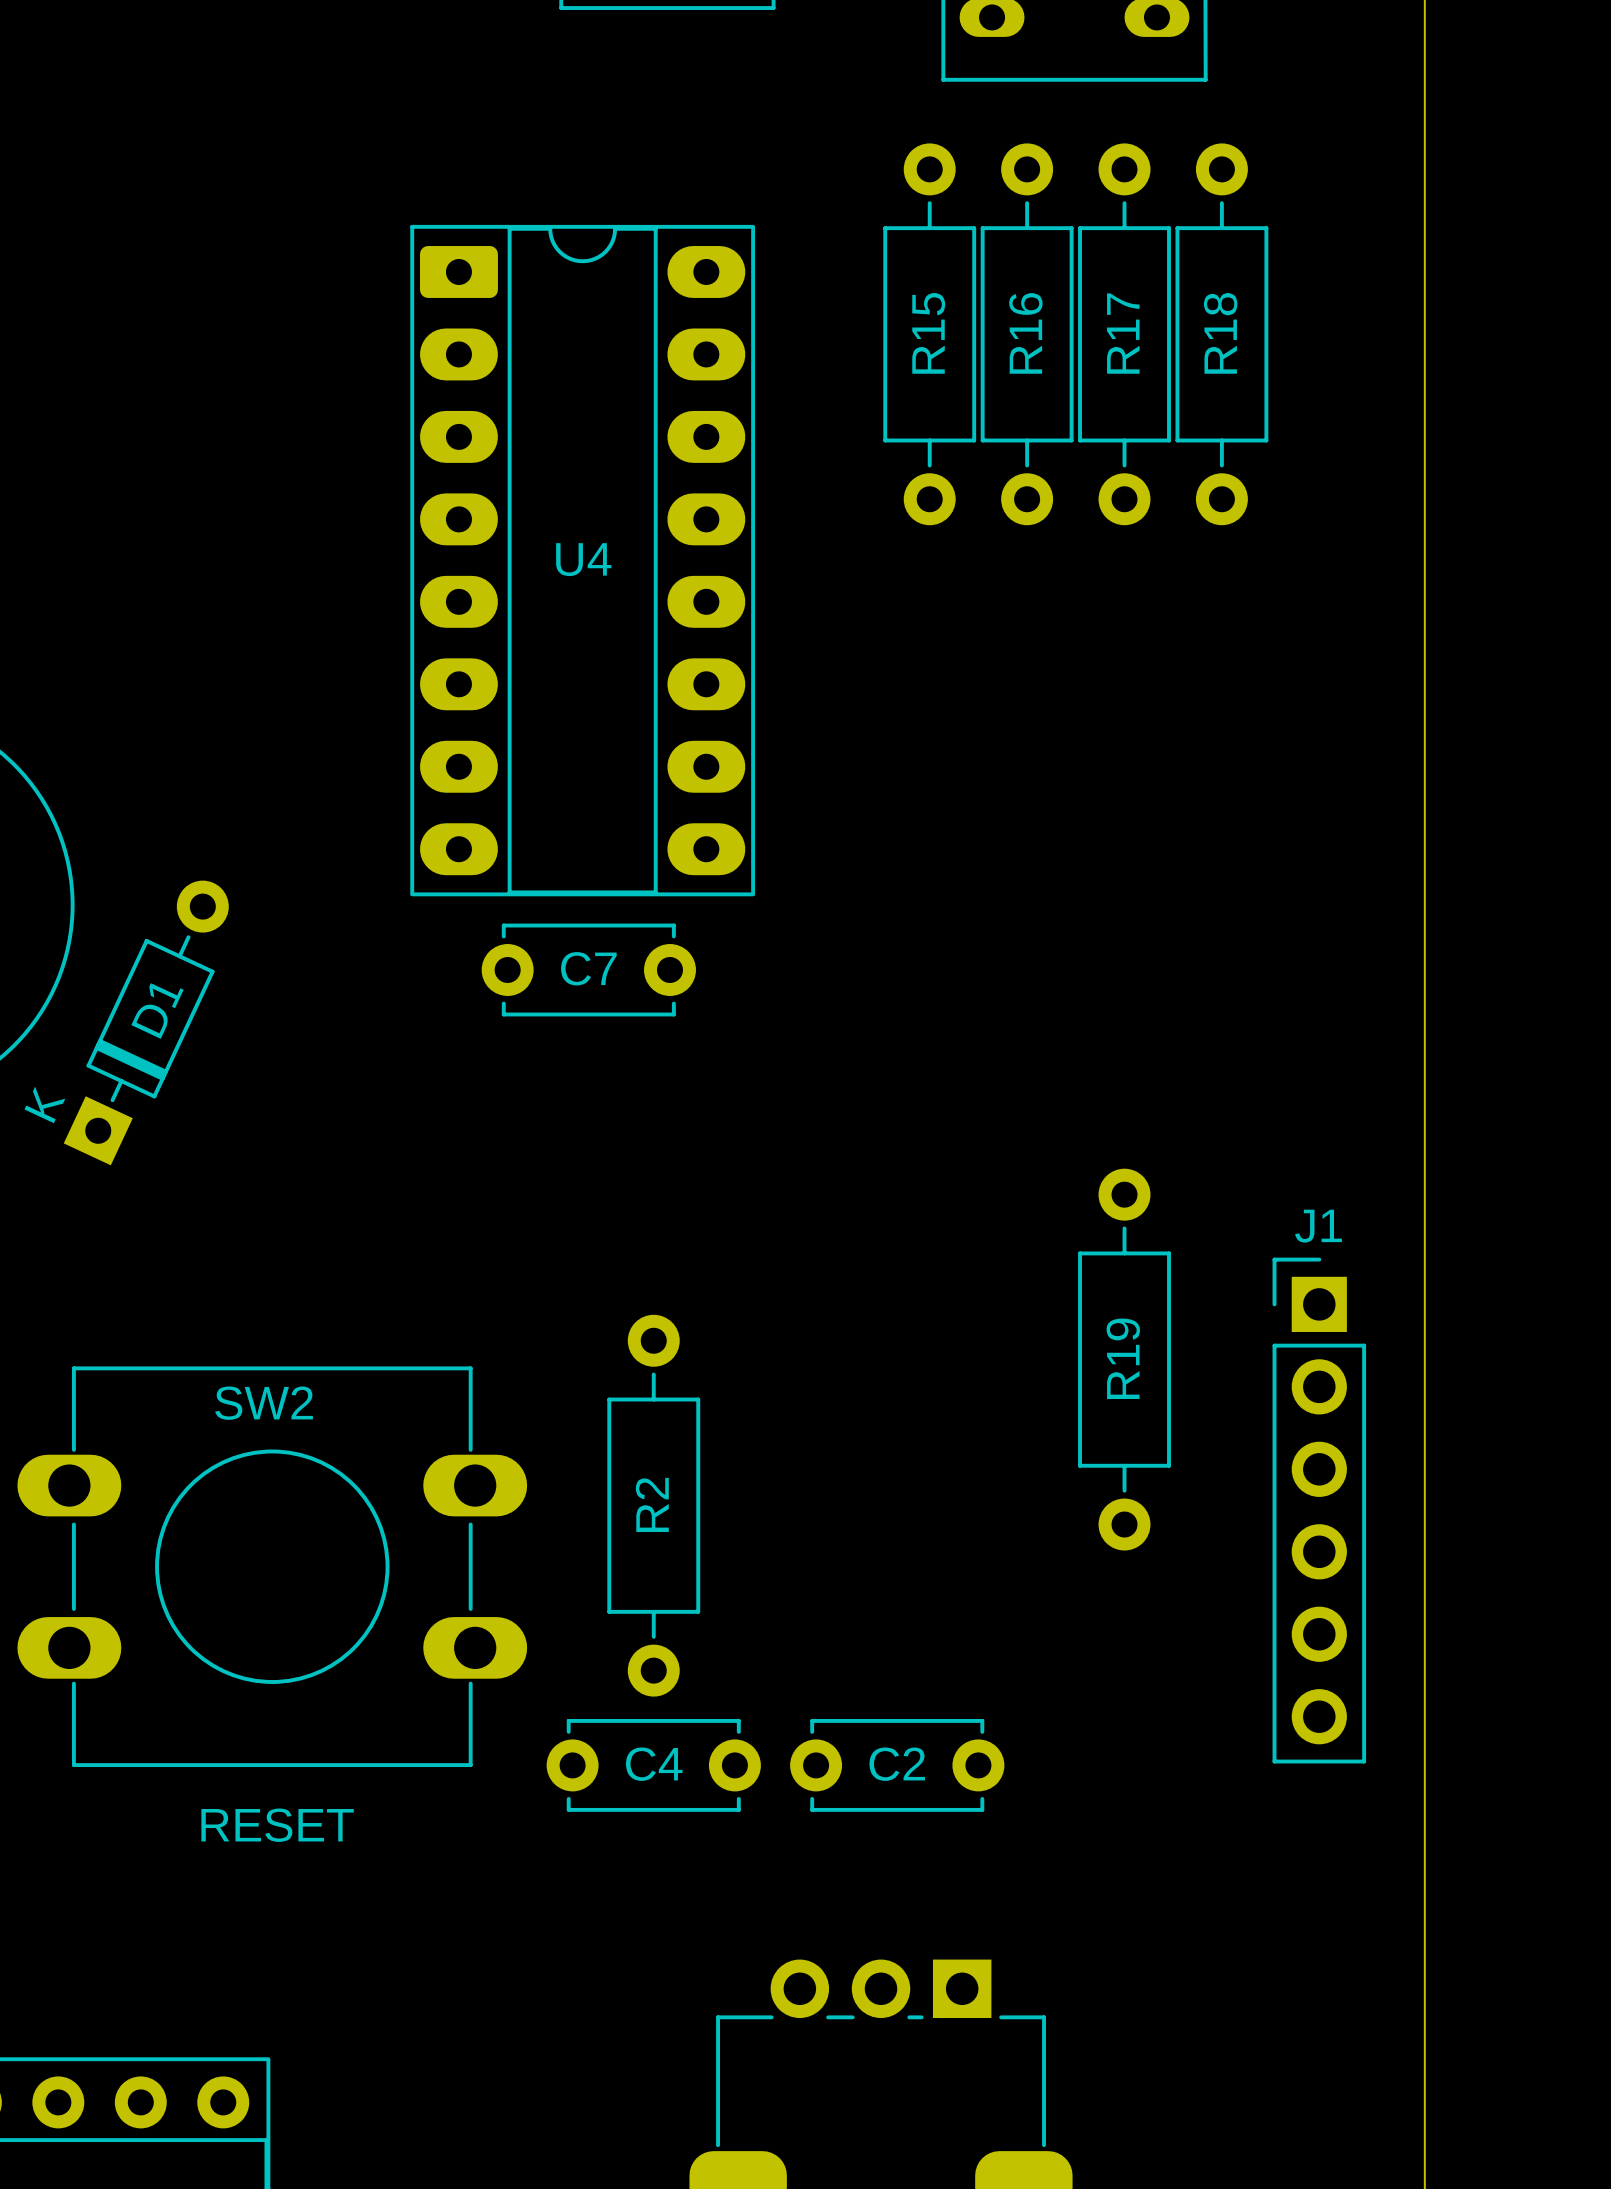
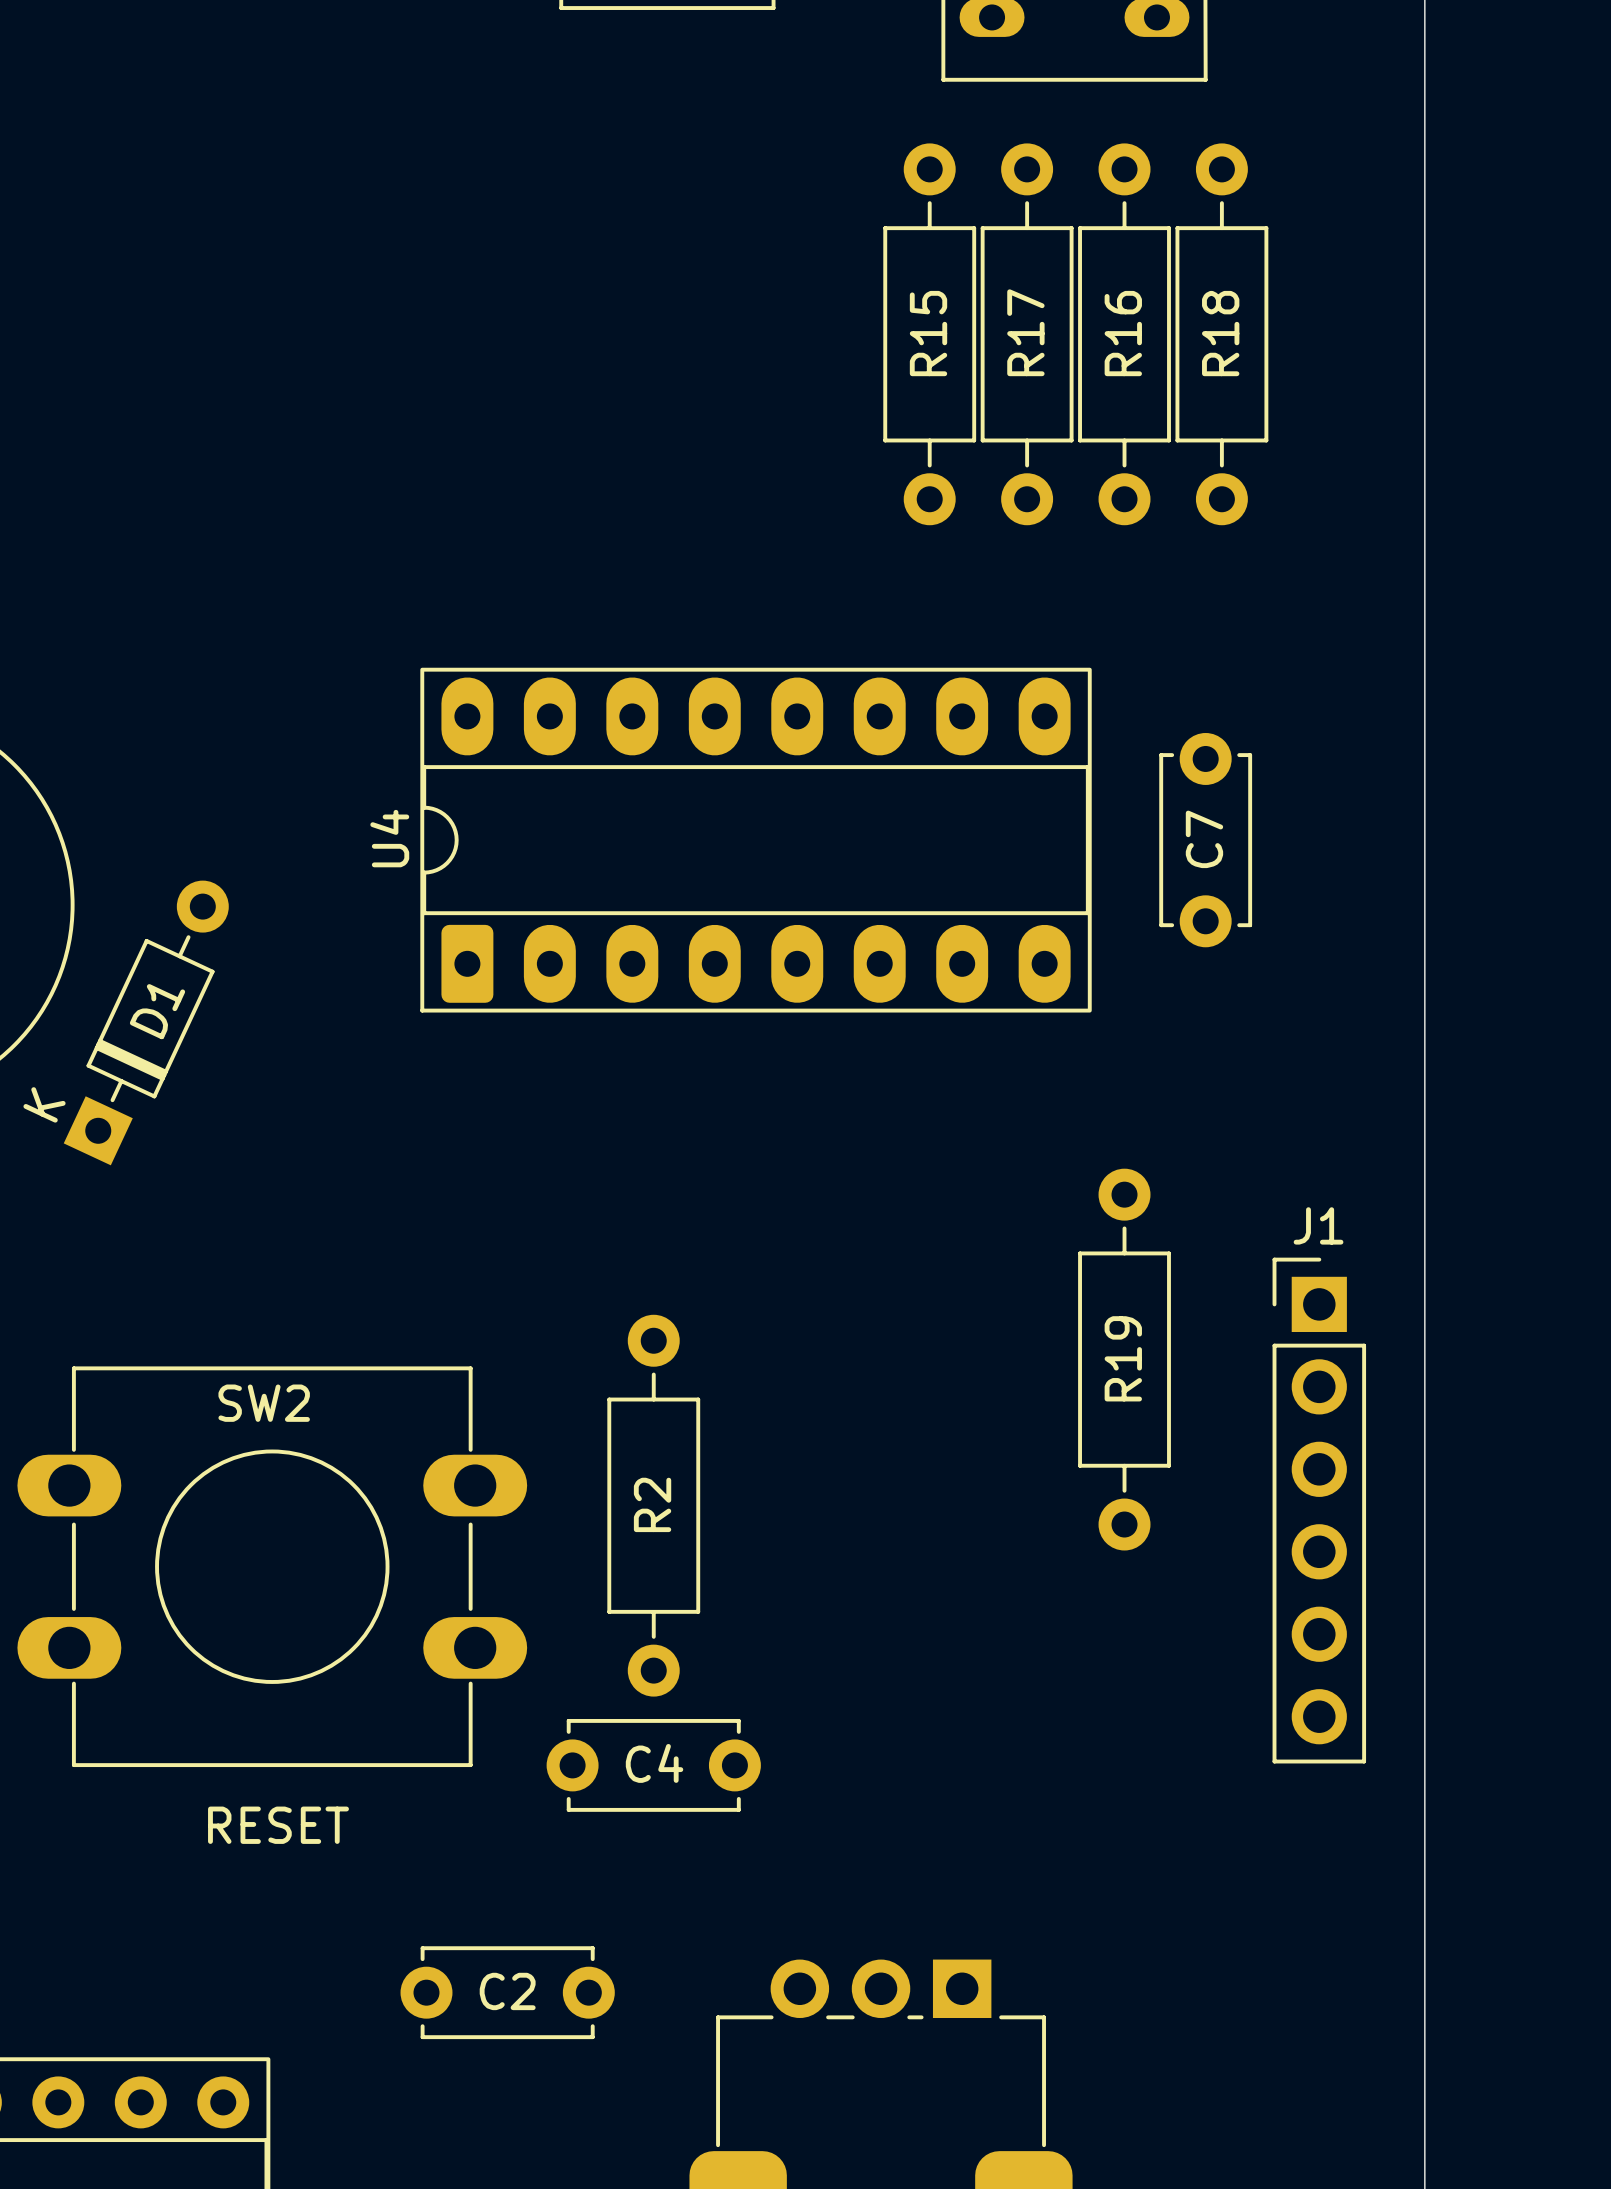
R16 name: R16 (1025, 333) -> R17 (1025, 332)
R17 name: R17 (1123, 333) -> R16 (1123, 333)
U4 name position: U4 (583, 559) -> U4 (389, 838)
U4 rotation: 0° (582, 560) -> 90° counterclockwise (756, 840)
C7 rotation: 0° (588, 970) -> 90° clockwise (1205, 840)
C7 position: (588, 970) -> (1205, 840)
C2 position: (897, 1765) -> (507, 1992)

